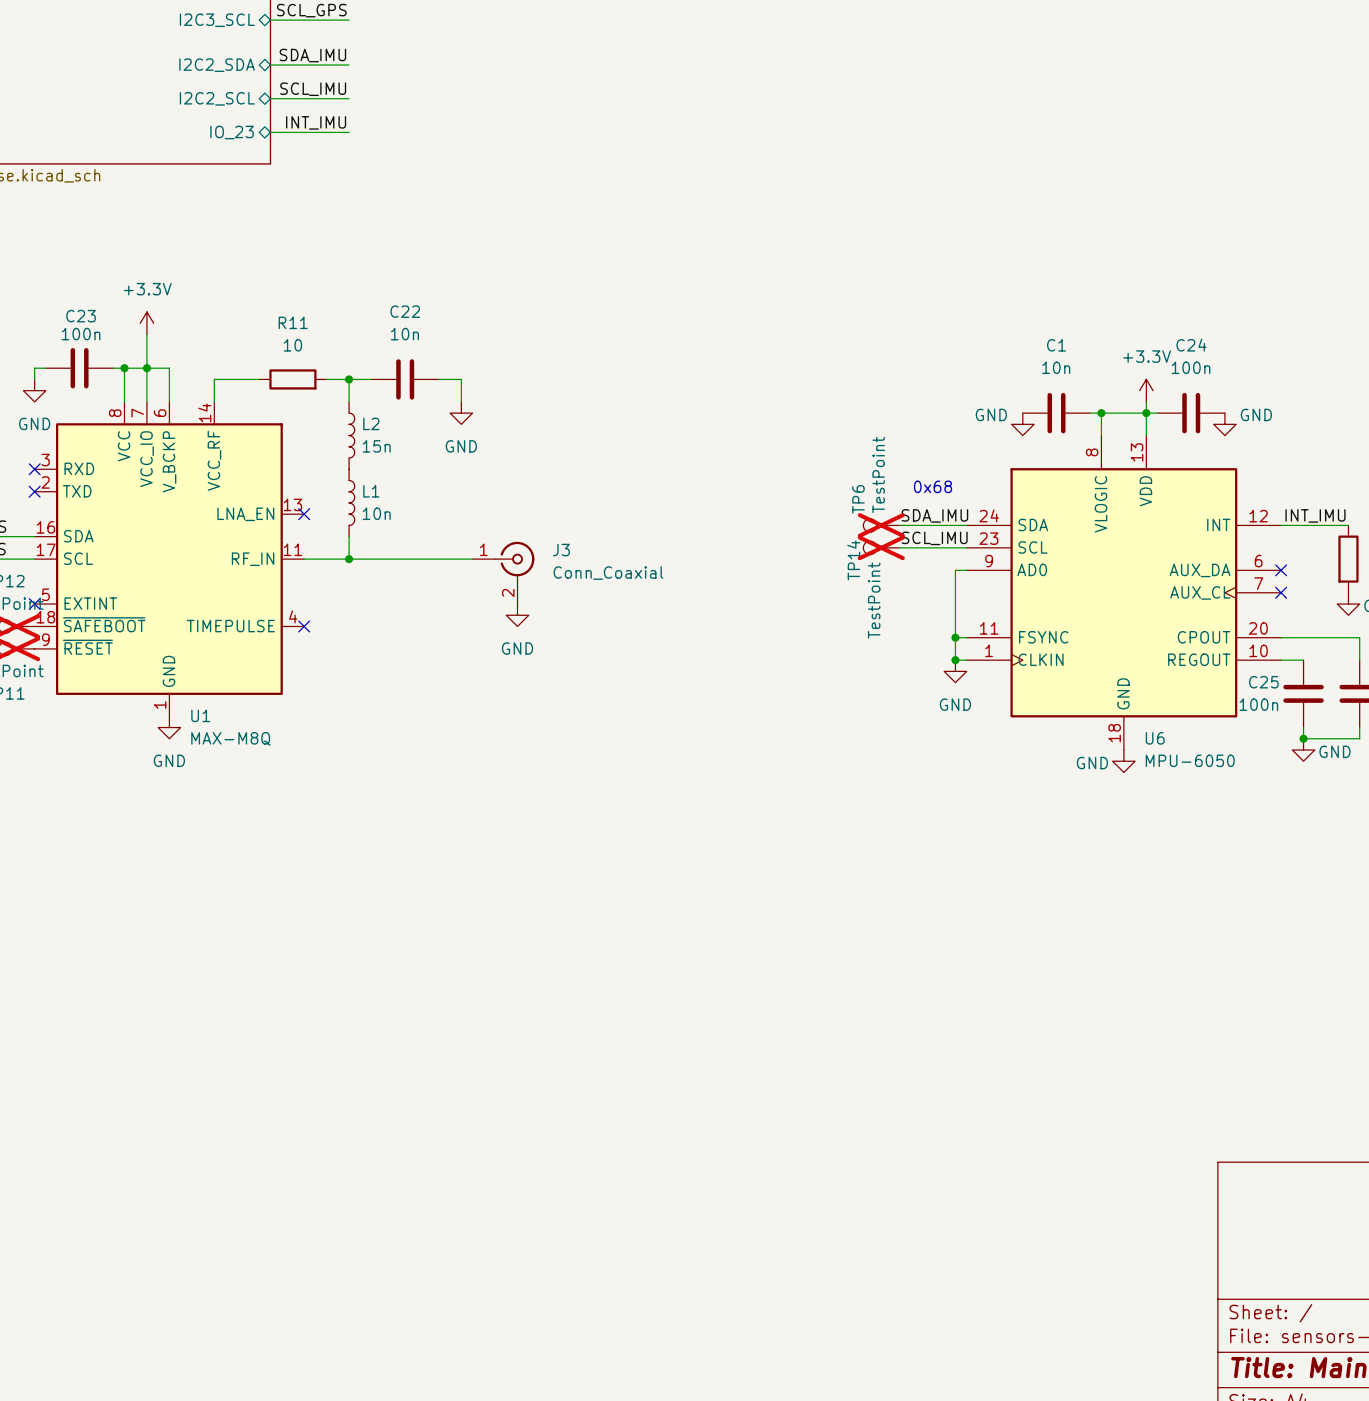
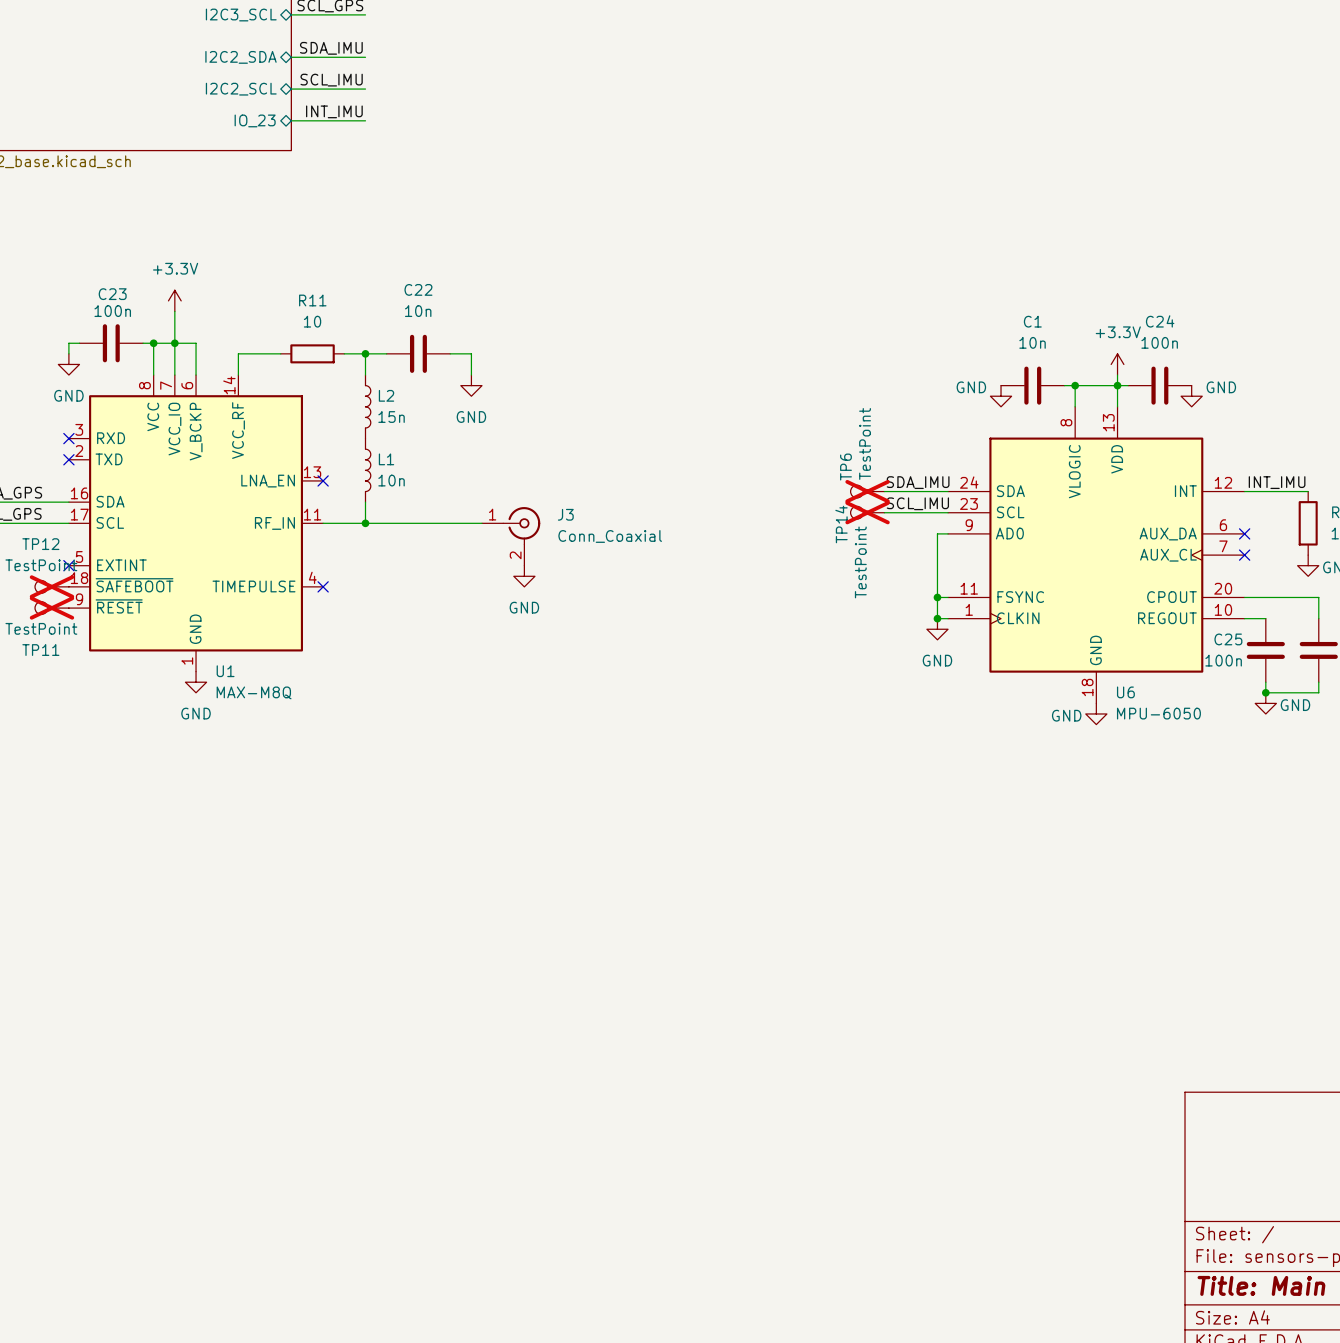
text: 0x68 (932, 486) -> none

